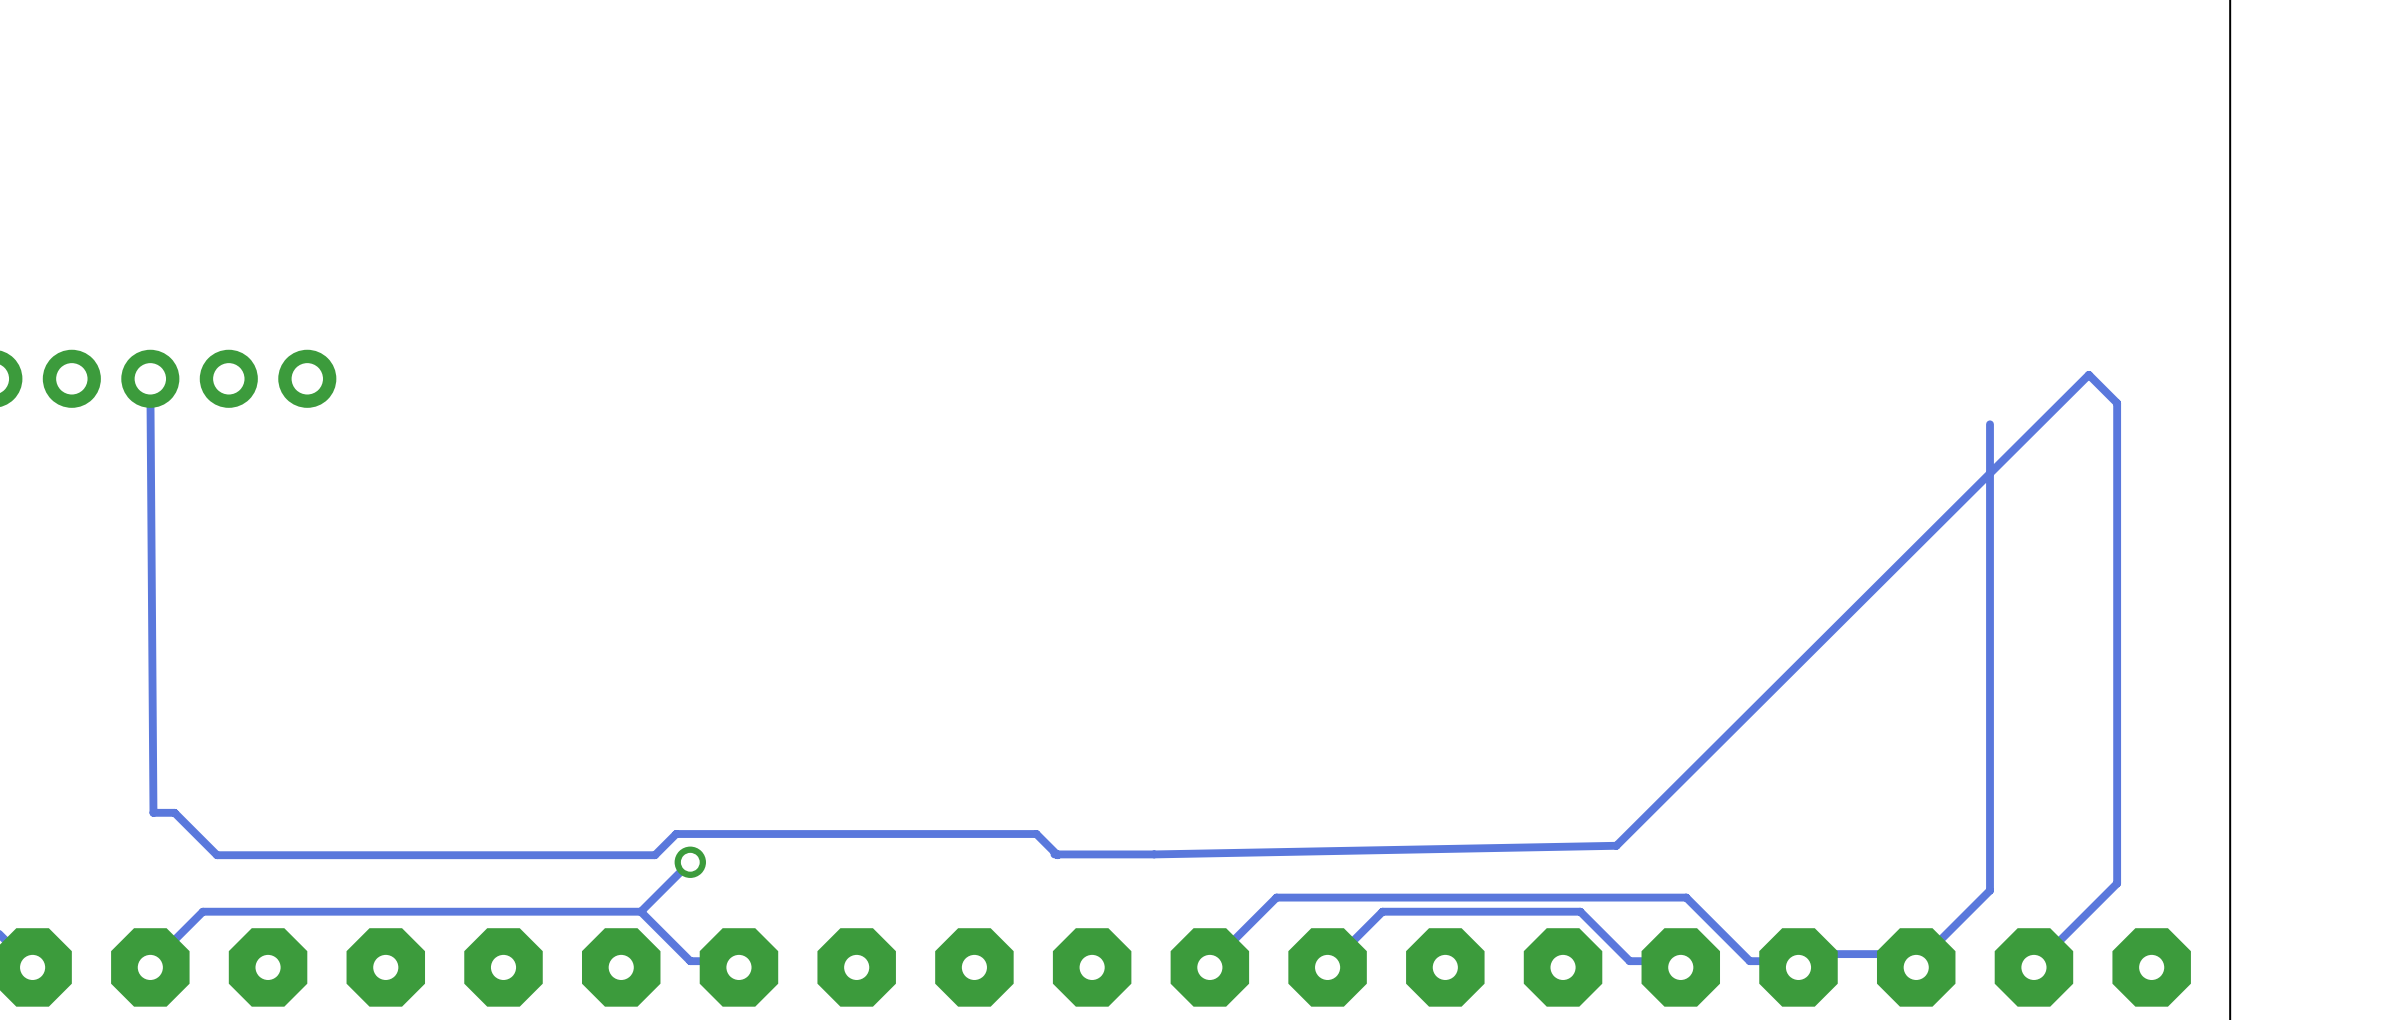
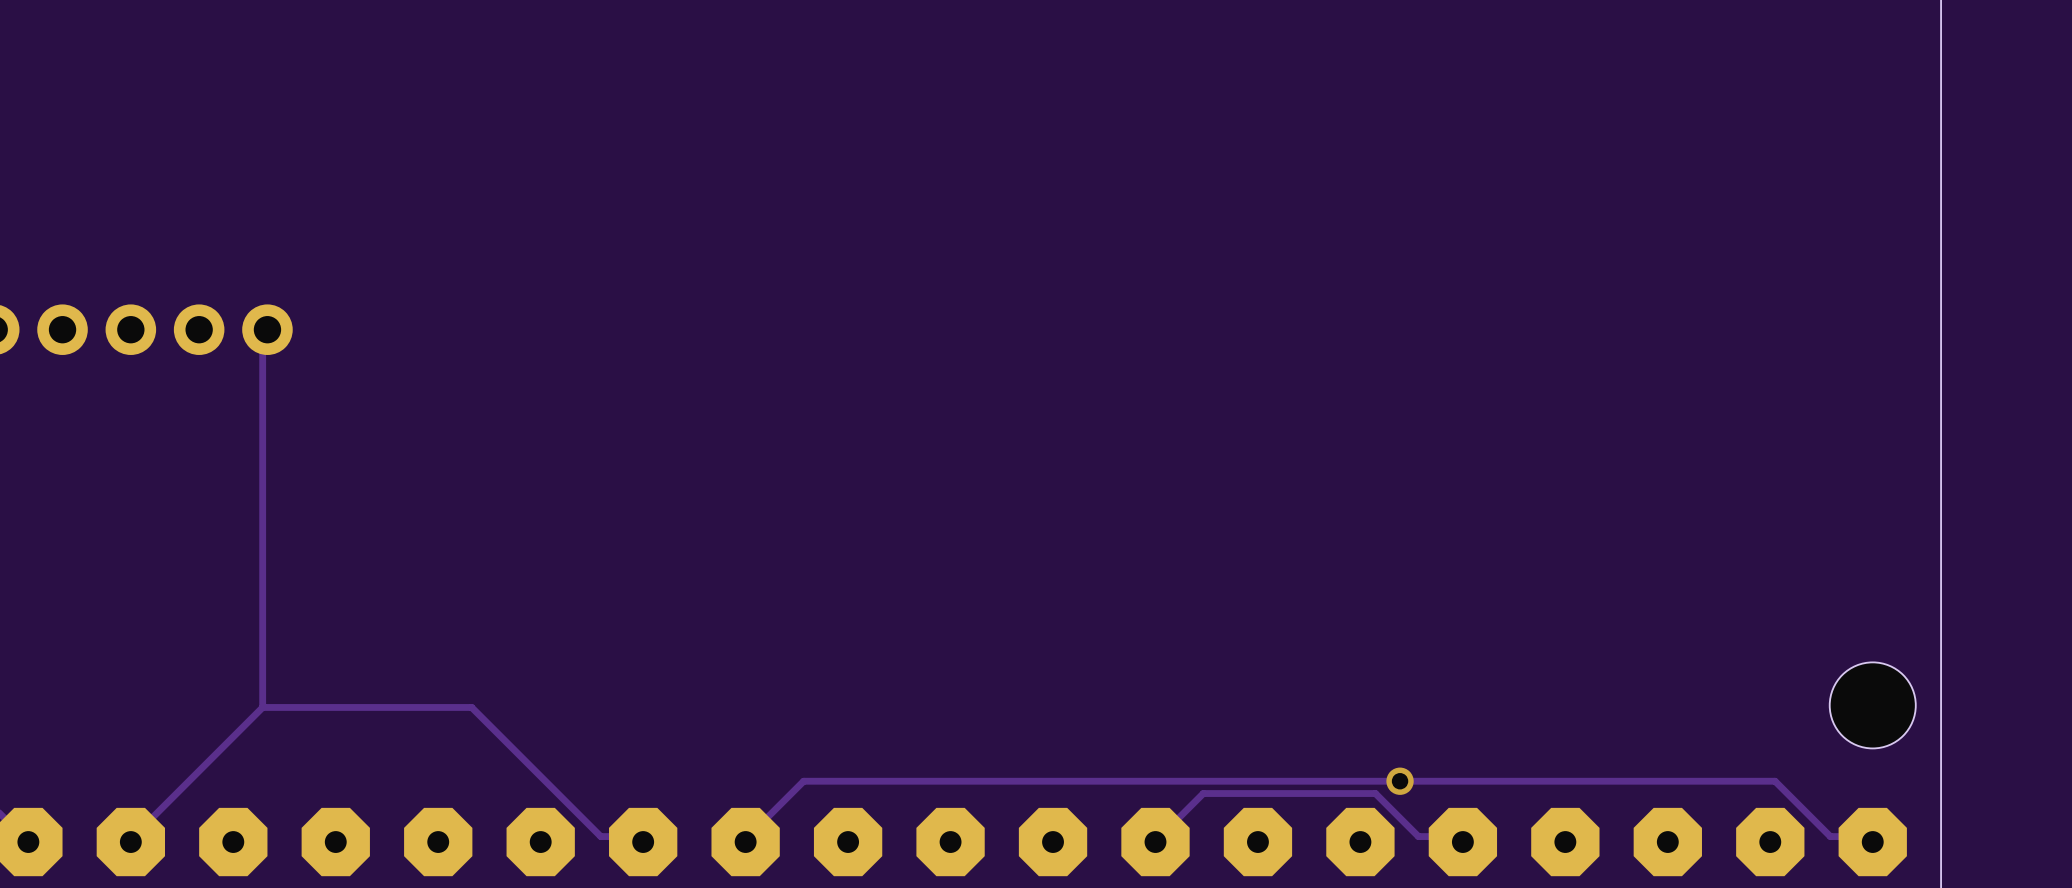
track: (150, 378) (153, 812) (174, 812) (217, 855) (654, 855) (676, 834) (1036, 834) (1057, 854) -> none
track: none -> (267, 329) (262, 332) (262, 707)
track: (1990, 424) (1990, 890) (1919, 961) -> none
hole: none -> (1872, 705)
track: none -> (262, 707) (471, 707) (557, 793)
track: (1054, 854) (1154, 854) (1616, 845) (2088, 374) (2117, 403) (2117, 883) (2033, 967) -> none
track: (690, 862) (640, 911) (202, 911) -> (262, 707) (176, 793)
via: (690, 862) -> none
track: (1276, 897) (1213, 961) (1209, 967) -> (1111, 781) (803, 781) (748, 836) (745, 842)
via: none -> (1400, 781)
track: (1686, 897) (1749, 961) (1792, 961) (1798, 967) (1799, 961) (1806, 954) (1912, 954) (1919, 961) -> (1467, 781) (1775, 781) (1830, 836) (1867, 836) (1872, 842)

